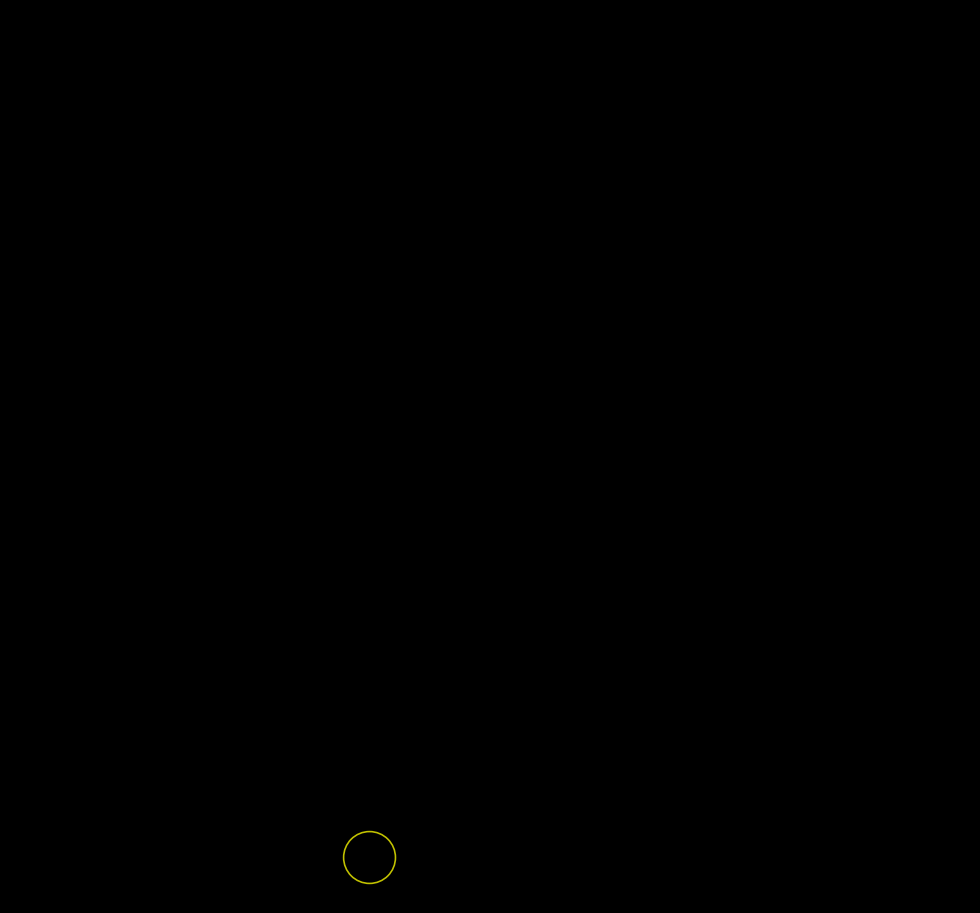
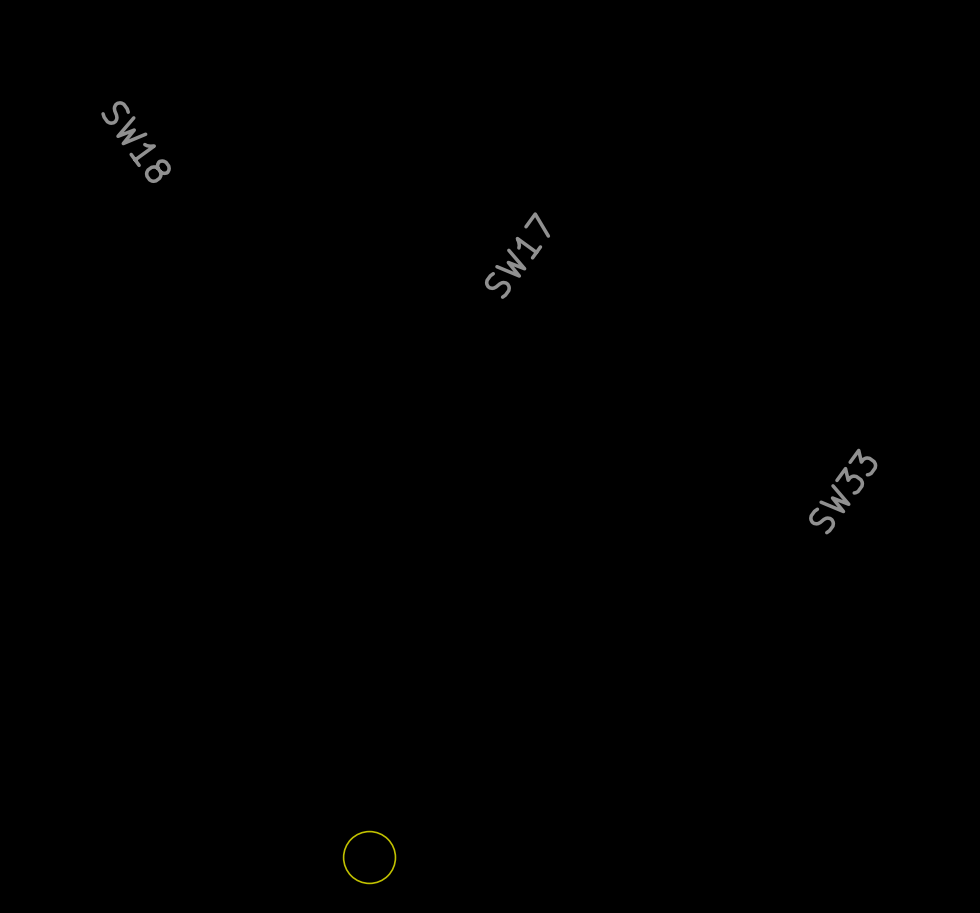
SW18: none -> (136, 142)
SW17: none -> (517, 255)
SW33: none -> (843, 491)

